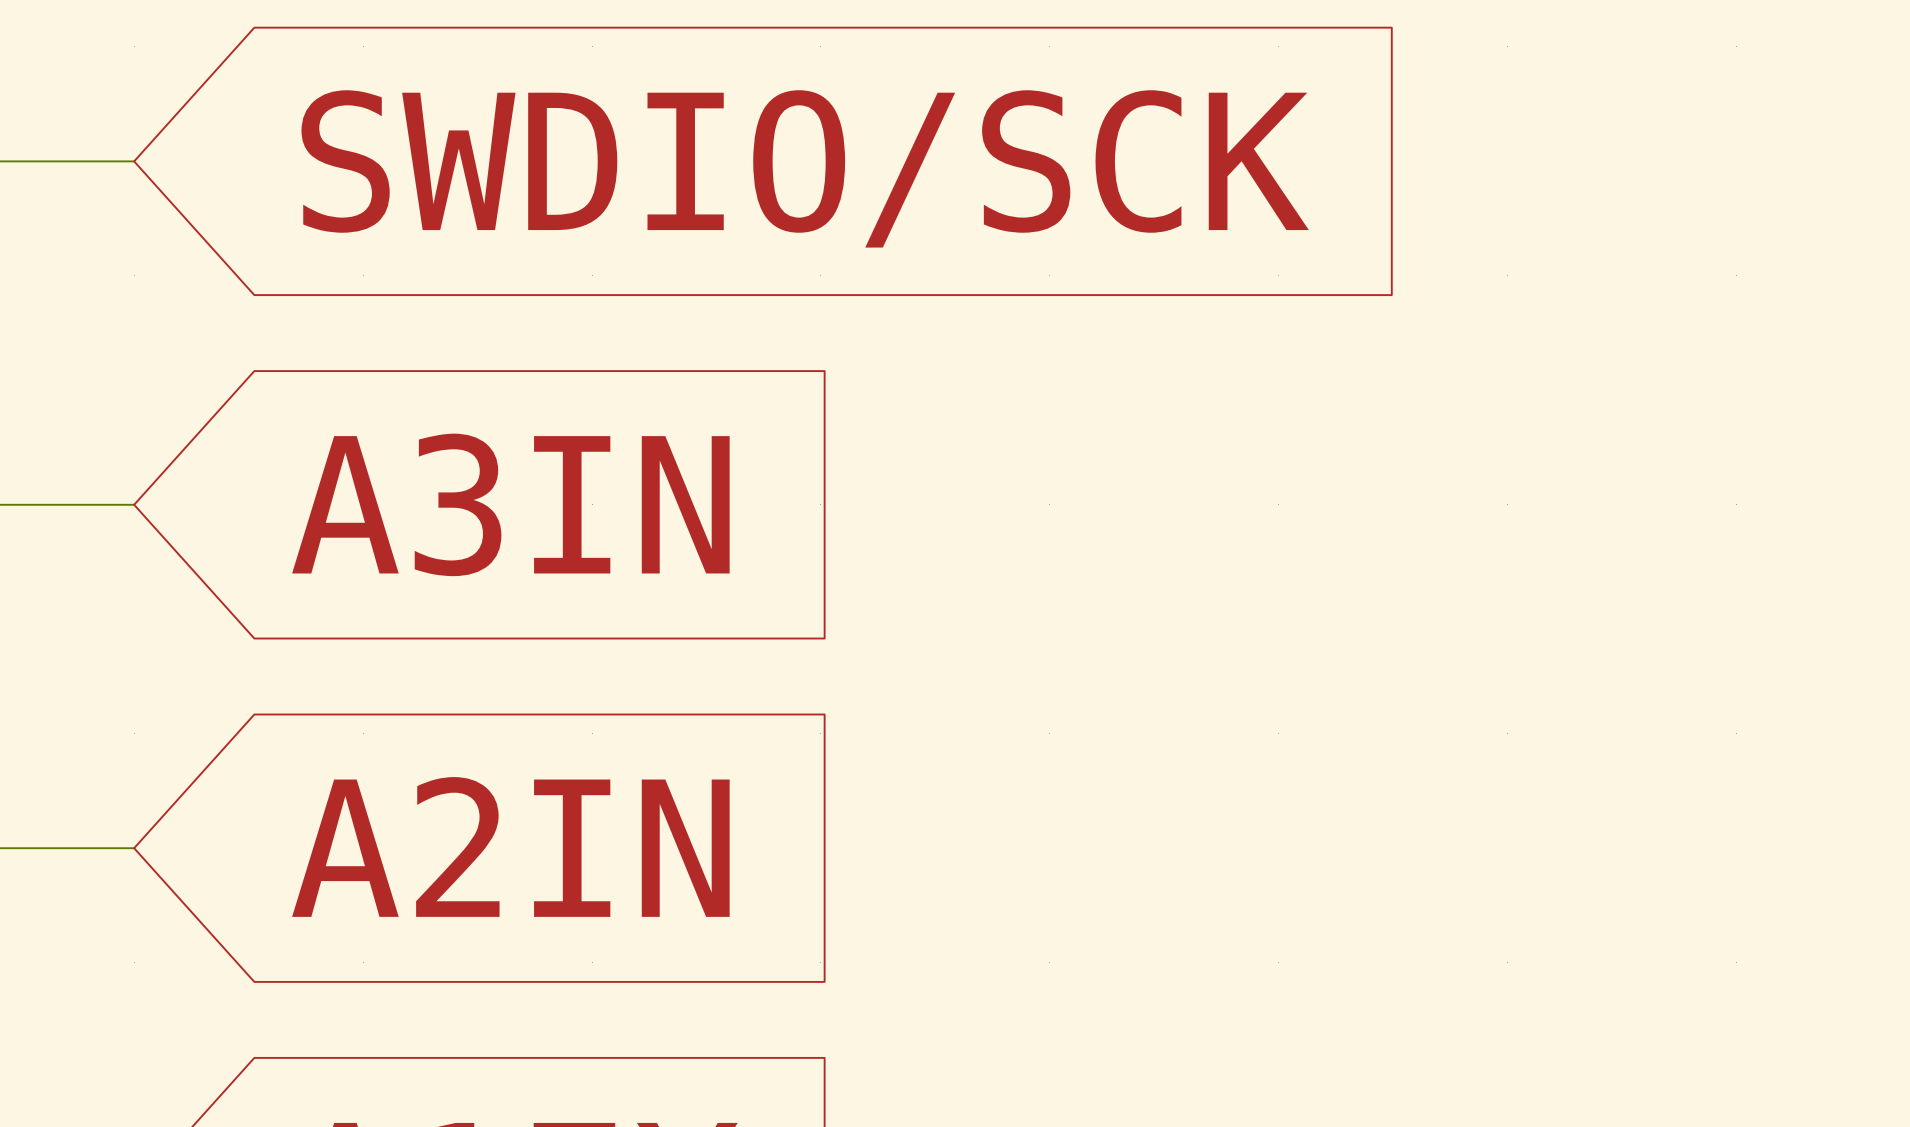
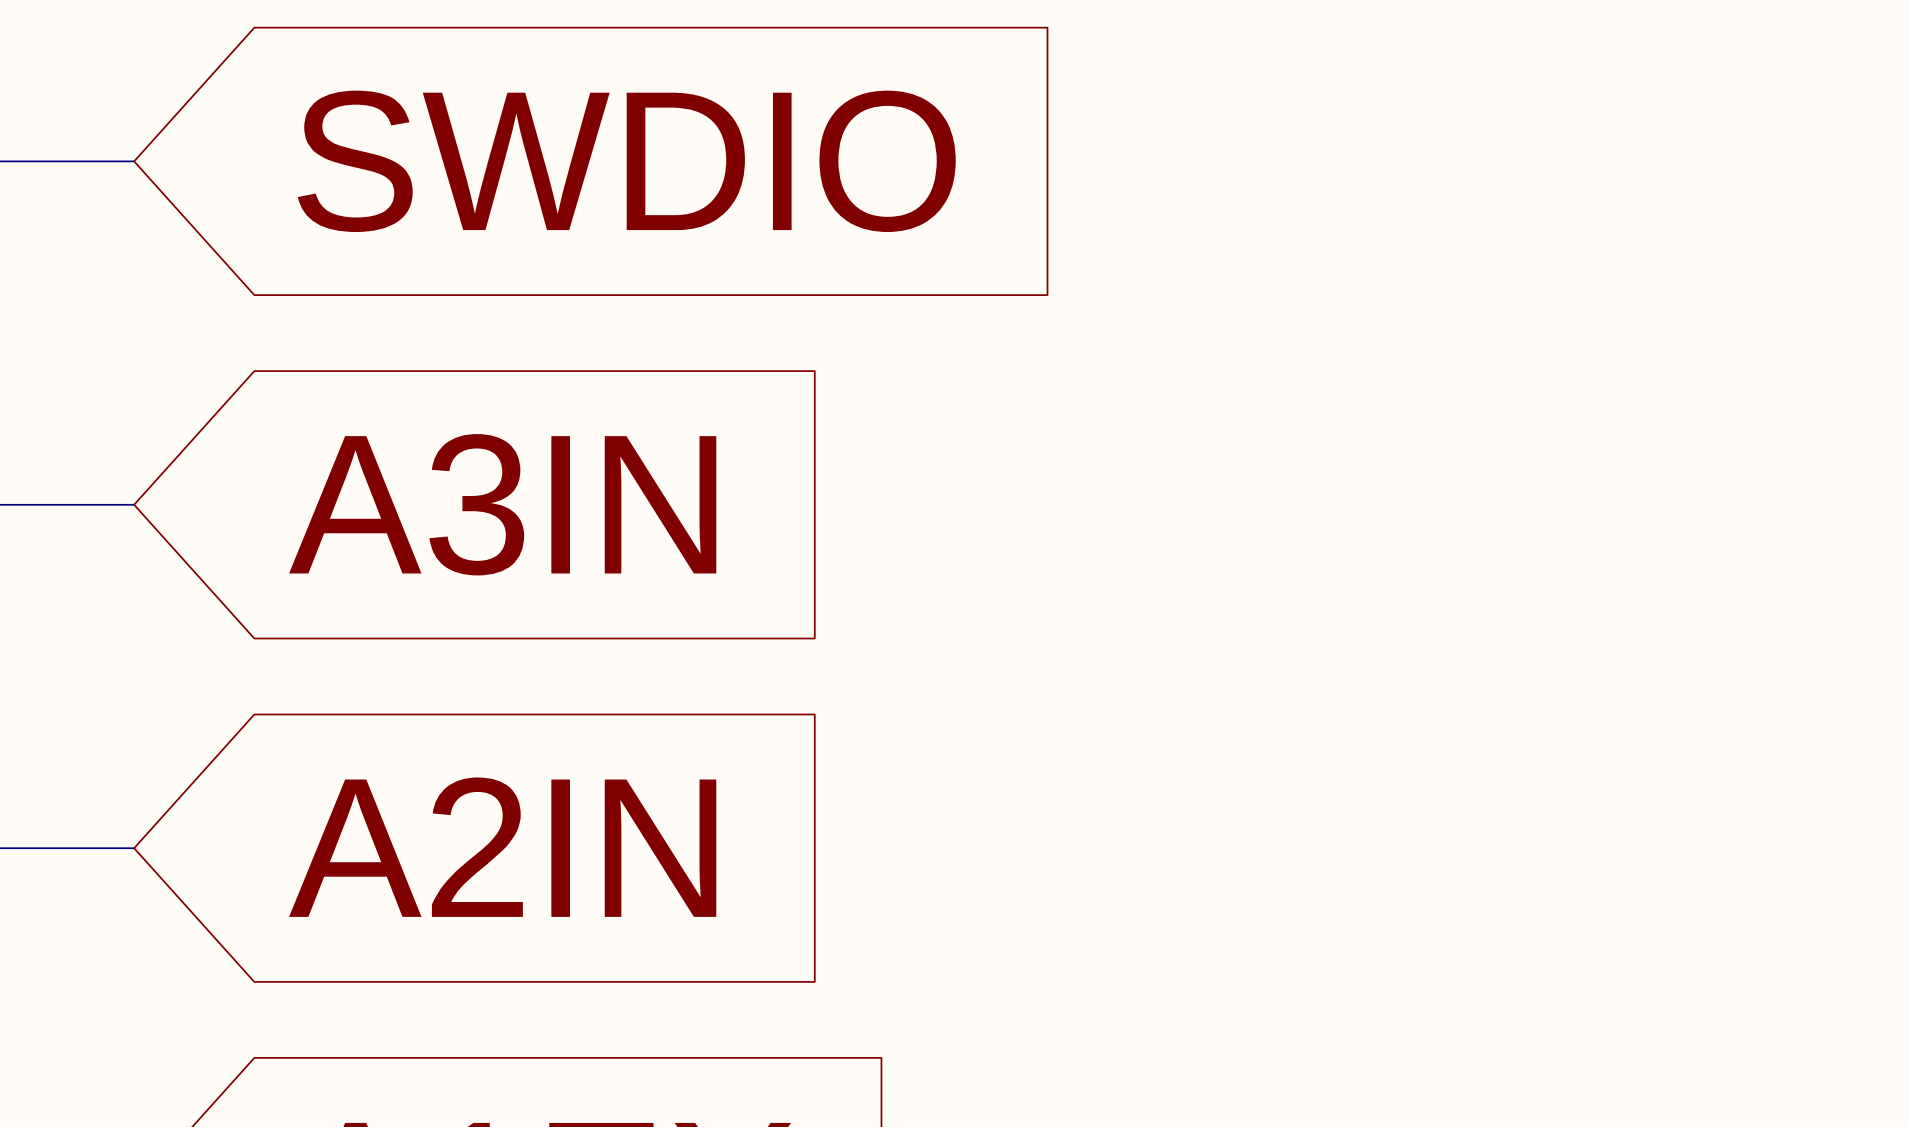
global label: SWDIO/SCK (805, 168) -> SWDIO (626, 161)

